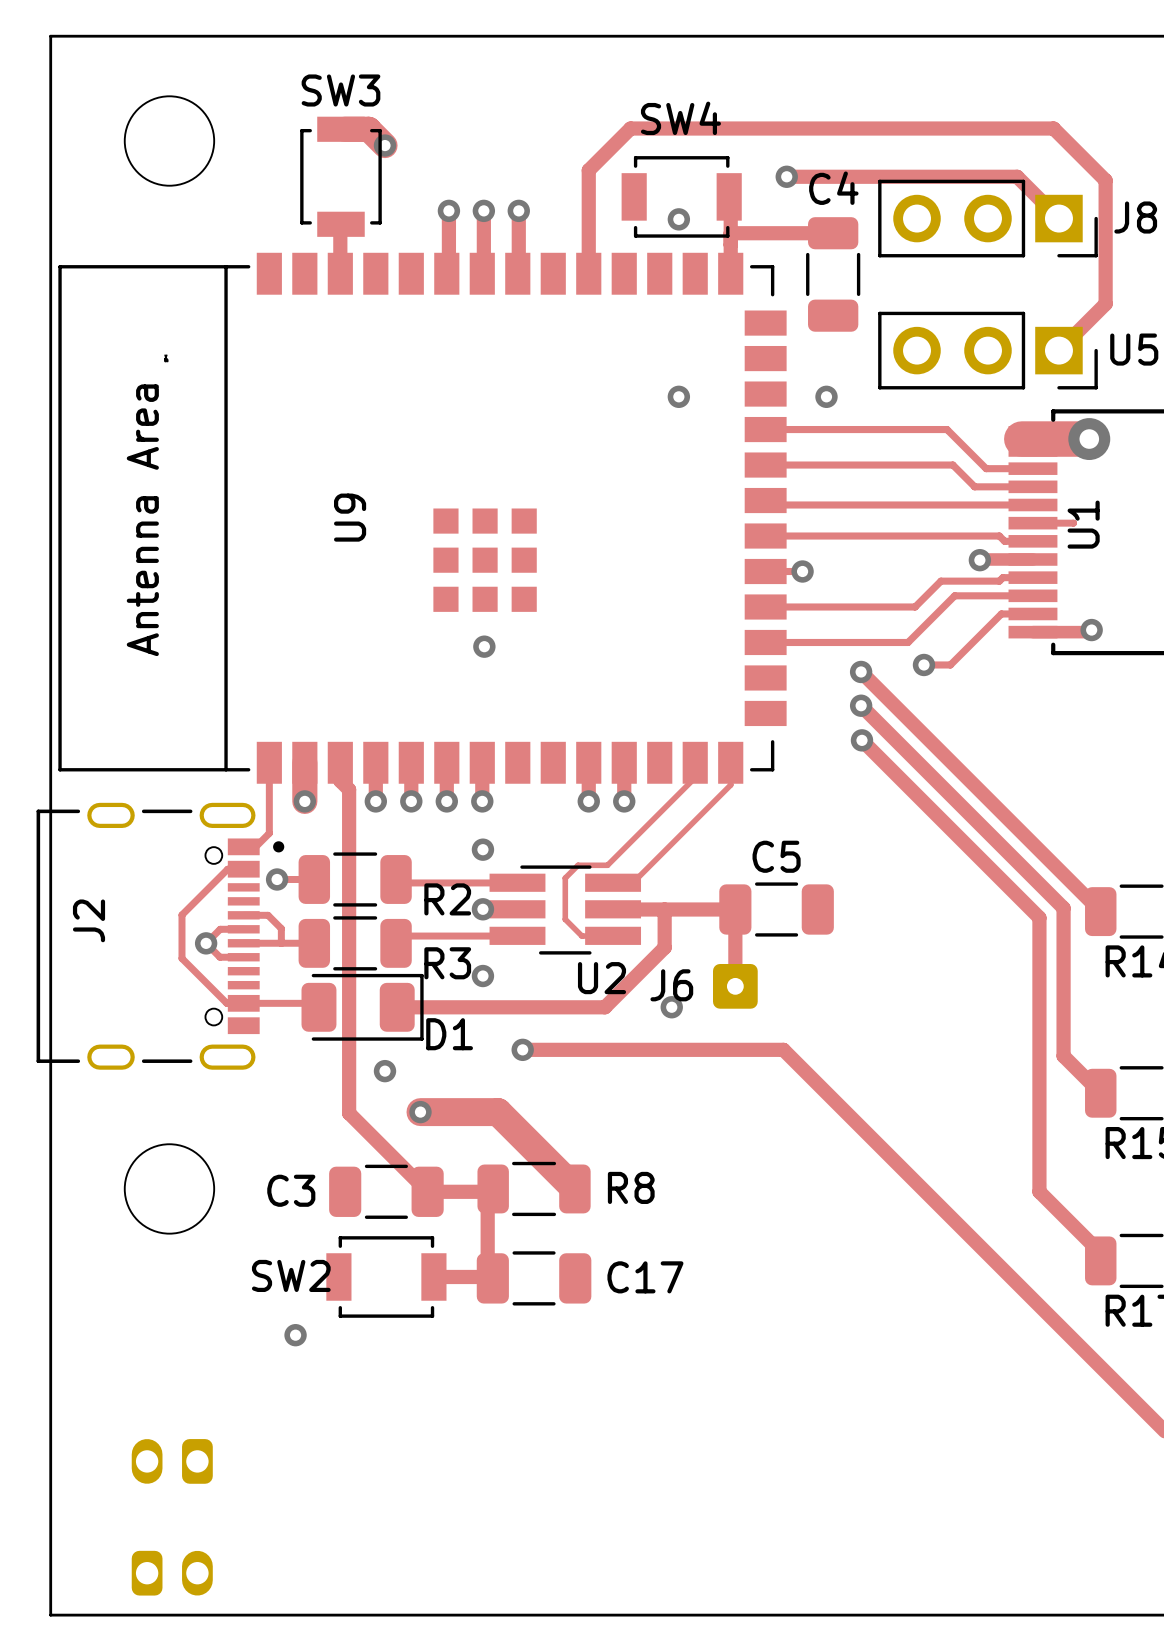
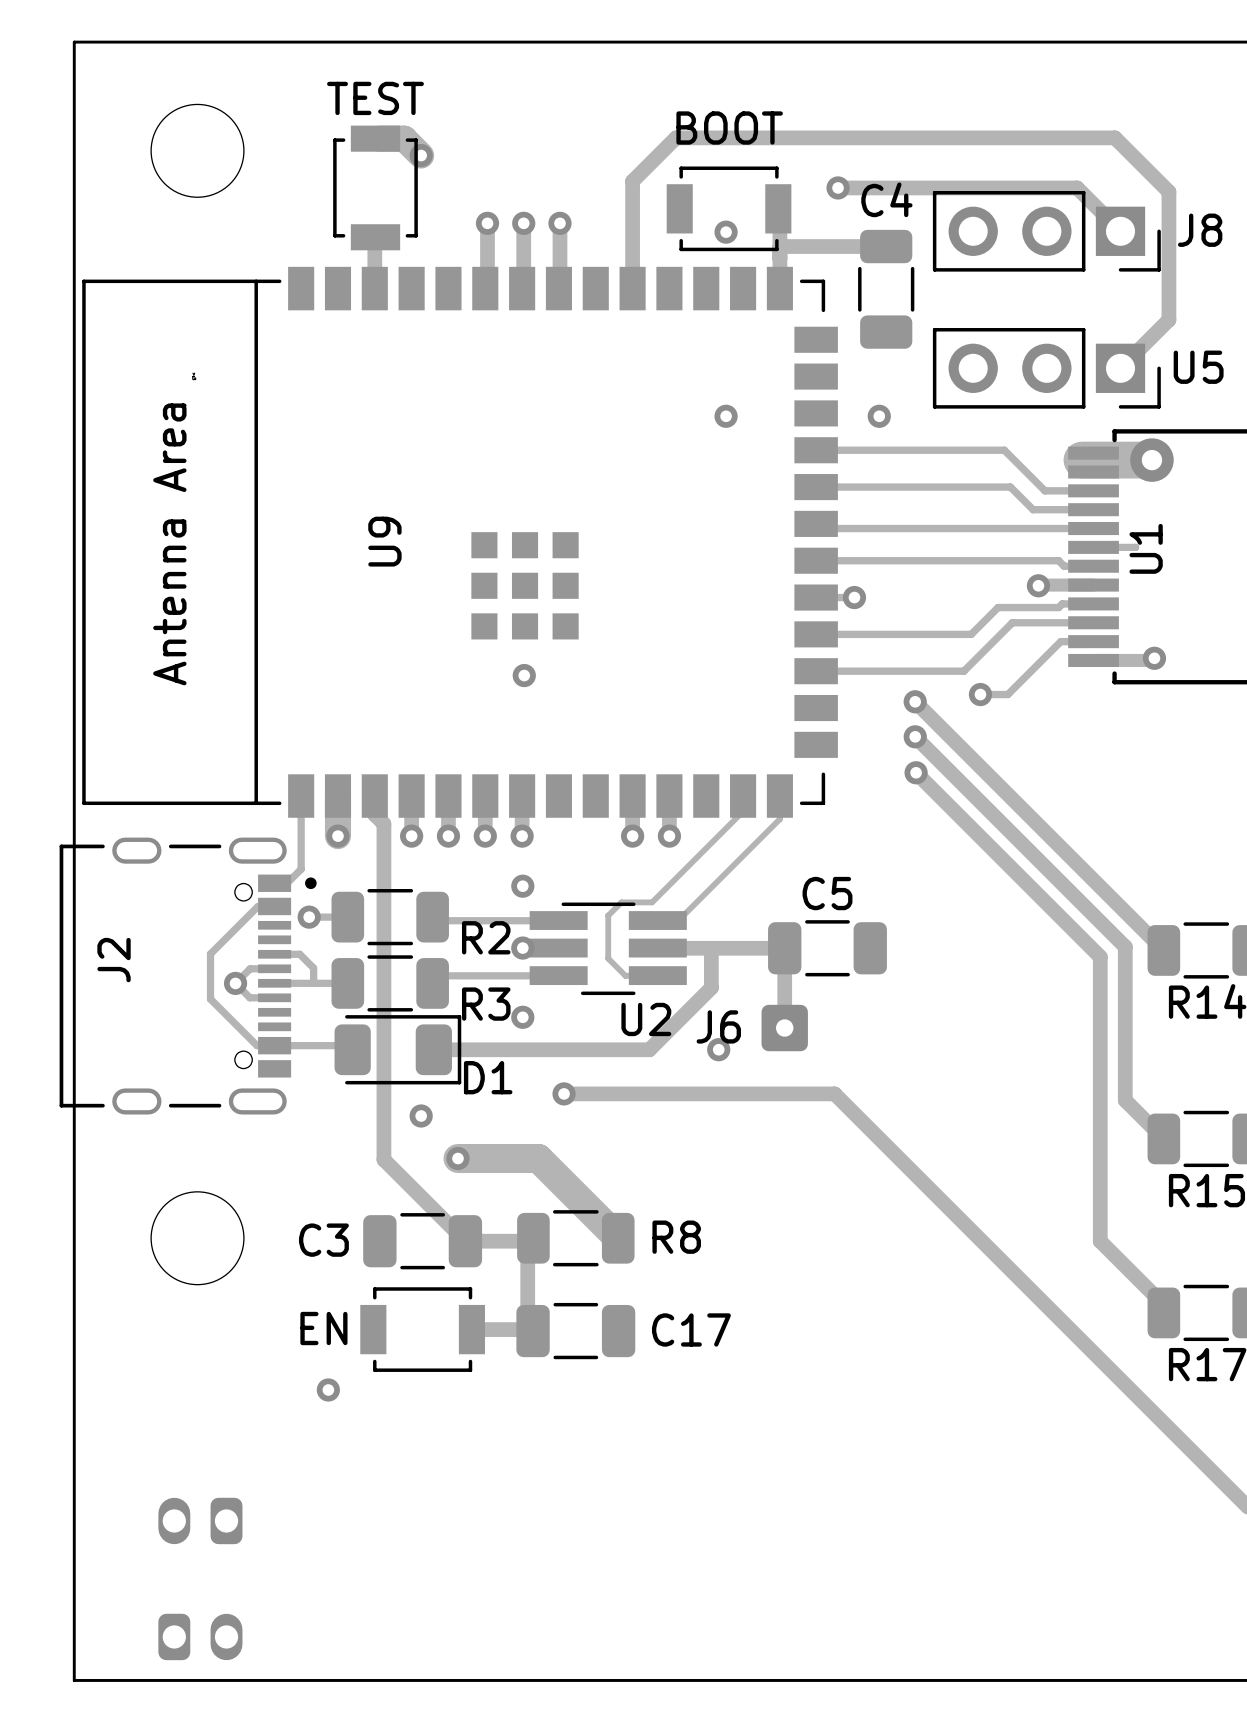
SW3 name: SW3 (340, 90) -> TEST (375, 98)
SW4 name: SW4 (680, 118) -> BOOT (729, 128)
SW2 name: SW2 (291, 1275) -> EN (323, 1328)

